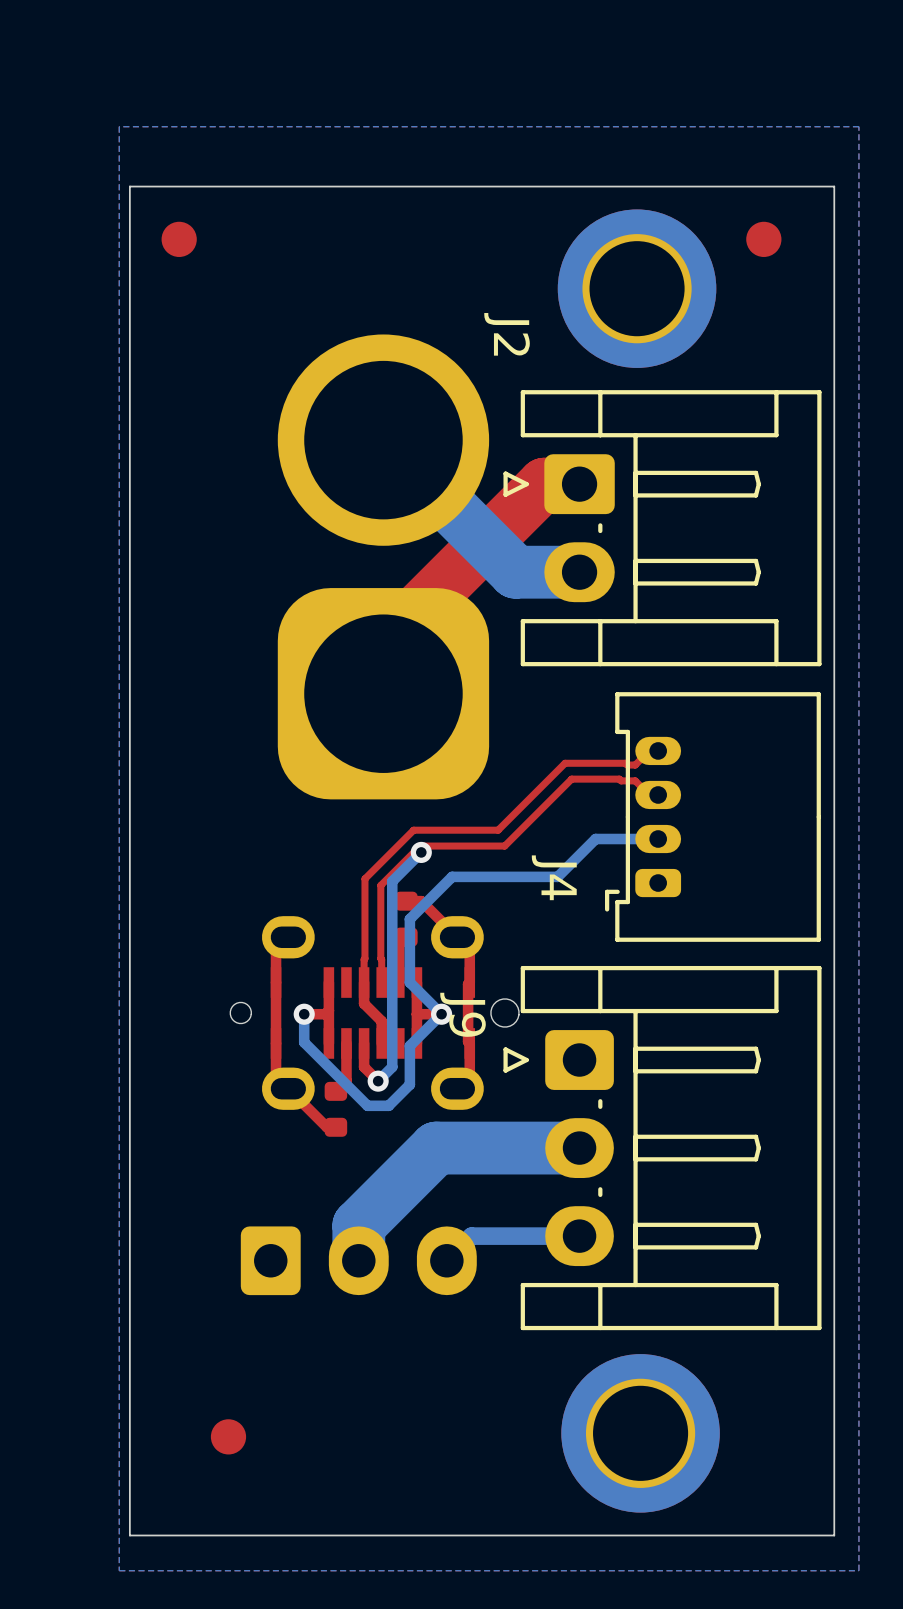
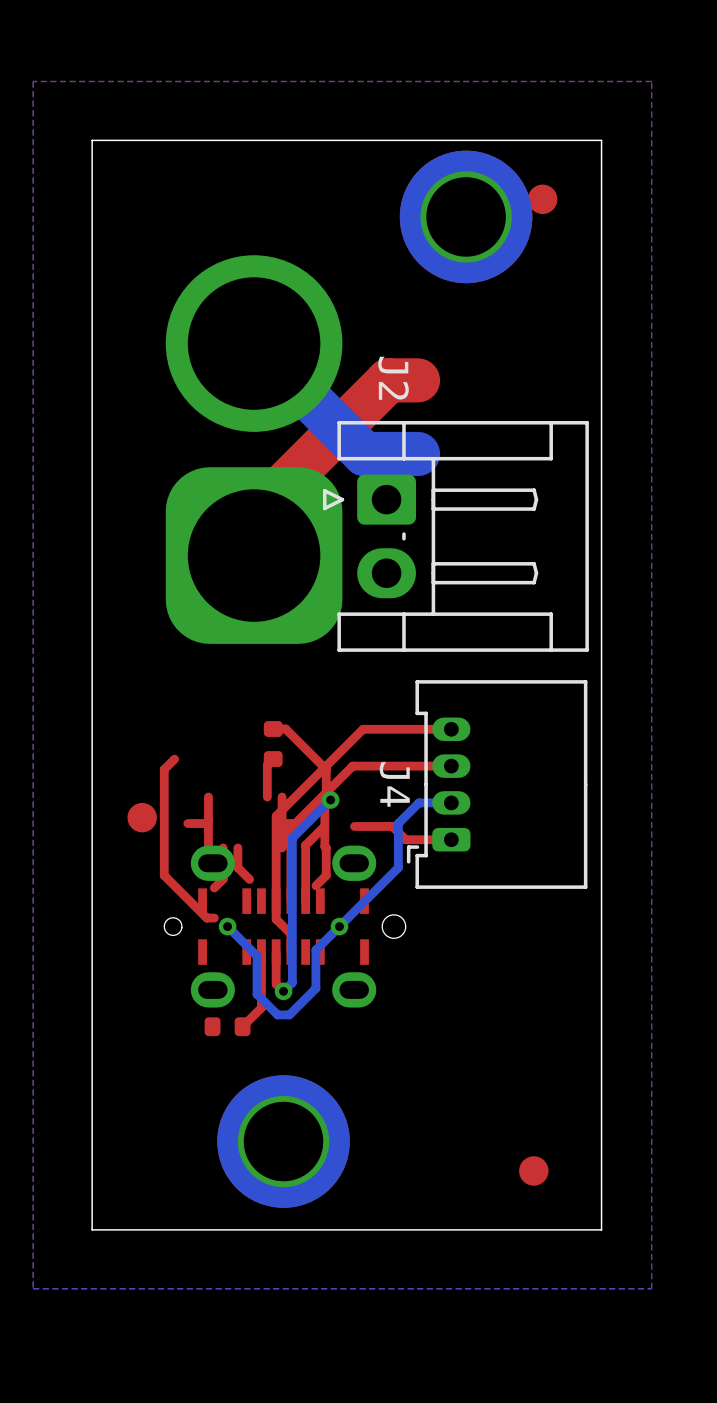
board edge: (834, 186) (129, 186) (129, 1535) (834, 1535) (834, 186) -> (601, 140) (601, 1229) (92, 1229) (92, 140) (601, 140)
part: (179, 239) -> none
part position: (763, 239) -> (542, 199)
J2 name position: J2 (507, 334) -> J2 (393, 378)
J2 position: (662, 528) -> (455, 536)
top track: (658, 750) (649, 750) (635, 765) (625, 763) (565, 763) (498, 830) (413, 830) (364, 878) (364, 1003) (381, 1021) (381, 1043) -> none
top track: (658, 794) (649, 794) (635, 780) (571, 779) (504, 846) (420, 846) (380, 885) (381, 982) -> none
J4 position: (712, 816) -> (497, 784)
bottom track: (658, 839) (595, 839) (557, 876) (452, 876) (409, 919) (409, 982) (441, 1014) (409, 1045) (409, 1084) (388, 1105) (367, 1105) (304, 1042) (304, 1014) -> none
bottom track: (421, 852) (392, 881) (392, 1067) (378, 1081) -> none
via: (421, 852) -> none
J4 name position: J4 (554, 877) -> J4 (394, 784)
top track: none -> (451, 729) (363, 729) (276, 816) (276, 919) (290, 933) (290, 952)
top track: none -> (451, 766) (352, 766) (290, 827) (290, 901)
bottom track: none -> (330, 799) (292, 838) (292, 982) (283, 991)
bottom track: none -> (451, 802) (418, 802) (398, 823) (398, 867) (315, 950) (315, 988) (289, 1014) (277, 1014) (257, 994) (257, 956) (227, 926)
part: none -> (142, 817)
part position: (374, 1012) -> (284, 926)
via: (304, 1014) -> none
via position: (441, 1014) -> (330, 799)
top track: none -> (324, 826) (305, 845) (305, 901)
top track: none -> (354, 826) (392, 826) (405, 839) (451, 839)
via: (378, 1081) -> none
part: (335, 1109) -> none
via: none -> (227, 926)
via: none -> (339, 926)
bottom track: (579, 1148) (436, 1148) (358, 1225) (358, 1260) -> none
J9: (662, 1148) -> none
top track: none -> (261, 952) (261, 1007) (242, 1026)
top track: none -> (276, 952) (276, 984) (283, 991)
via: none -> (283, 991)
part footprint: [240, 1226, 477, 1296] -> [204, 1017, 251, 1037]
bottom track: (579, 1236) (471, 1236) (446, 1260) -> none
part: none -> (533, 1170)
part position: (640, 1433) -> (283, 1141)
part: (228, 1436) -> none

